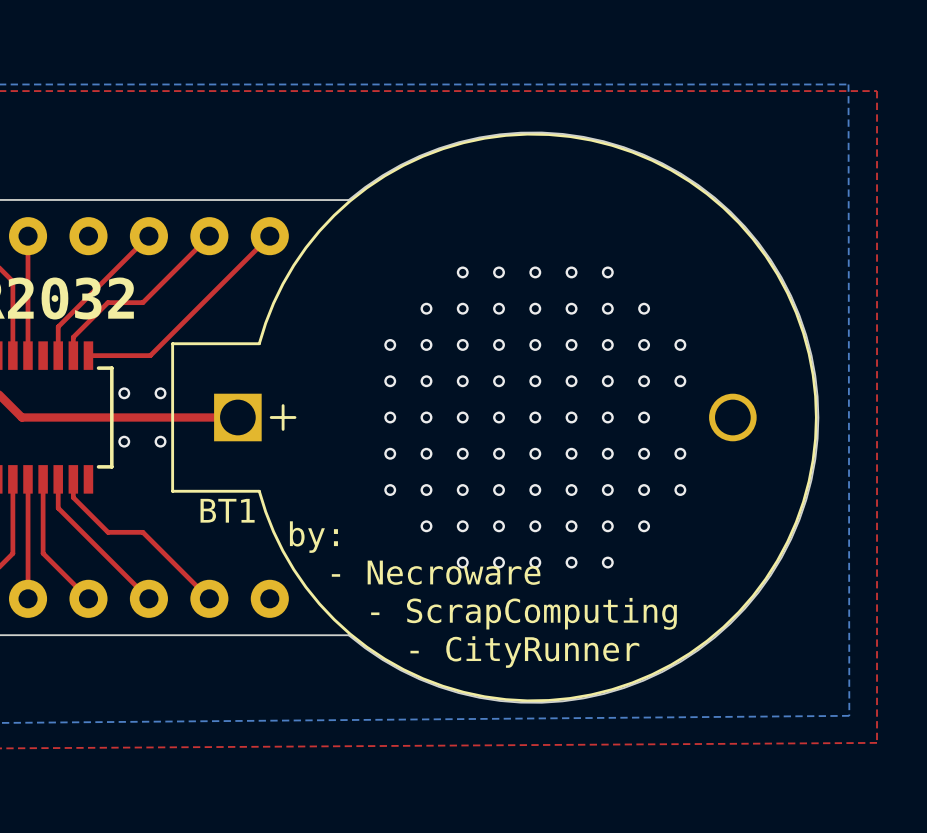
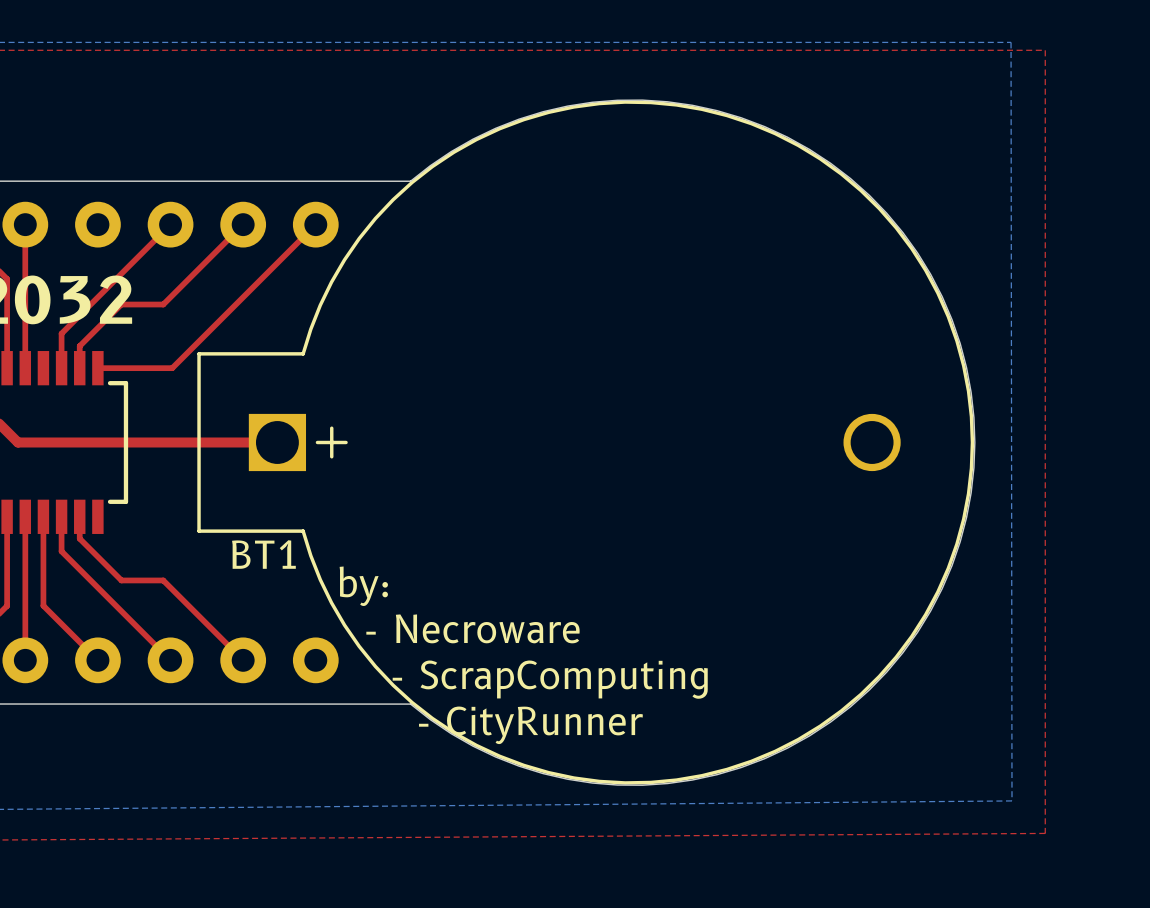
via: (462, 272) -> none
via: (499, 272) -> none
via: (535, 272) -> none
via: (571, 272) -> none
via: (607, 272) -> none
via: (426, 308) -> none
via: (462, 308) -> none
via: (499, 308) -> none
via: (535, 308) -> none
via: (571, 308) -> none
via: (607, 308) -> none
via: (644, 308) -> none
via: (390, 344) -> none
via: (426, 344) -> none
via: (462, 344) -> none
via: (499, 344) -> none
via: (535, 344) -> none
via: (571, 344) -> none
via: (607, 344) -> none
via: (644, 344) -> none
via: (680, 344) -> none
via: (390, 381) -> none
via: (426, 381) -> none
via: (462, 381) -> none
via: (499, 381) -> none
via: (535, 381) -> none
via: (571, 381) -> none
via: (607, 381) -> none
via: (644, 381) -> none
via: (680, 381) -> none
via: (124, 393) -> none
via: (160, 393) -> none
via: (390, 417) -> none
via: (426, 417) -> none
via: (462, 417) -> none
via: (499, 417) -> none
via: (535, 417) -> none
via: (571, 417) -> none
via: (607, 417) -> none
via: (644, 417) -> none
via: (124, 441) -> none
via: (160, 441) -> none
via: (390, 453) -> none
via: (426, 453) -> none
via: (462, 453) -> none
via: (499, 453) -> none
via: (535, 453) -> none
via: (571, 453) -> none
via: (607, 453) -> none
via: (644, 453) -> none
via: (680, 453) -> none
via: (390, 490) -> none
via: (426, 490) -> none
via: (462, 490) -> none
via: (499, 490) -> none
via: (535, 490) -> none
via: (571, 490) -> none
via: (607, 490) -> none
via: (644, 490) -> none
via: (680, 490) -> none
via: (426, 526) -> none
via: (462, 526) -> none
via: (499, 526) -> none
via: (535, 526) -> none
via: (571, 526) -> none
via: (607, 526) -> none
via: (644, 526) -> none
via: (462, 562) -> none
via: (499, 562) -> none
via: (535, 562) -> none
via: (571, 562) -> none
via: (607, 562) -> none

